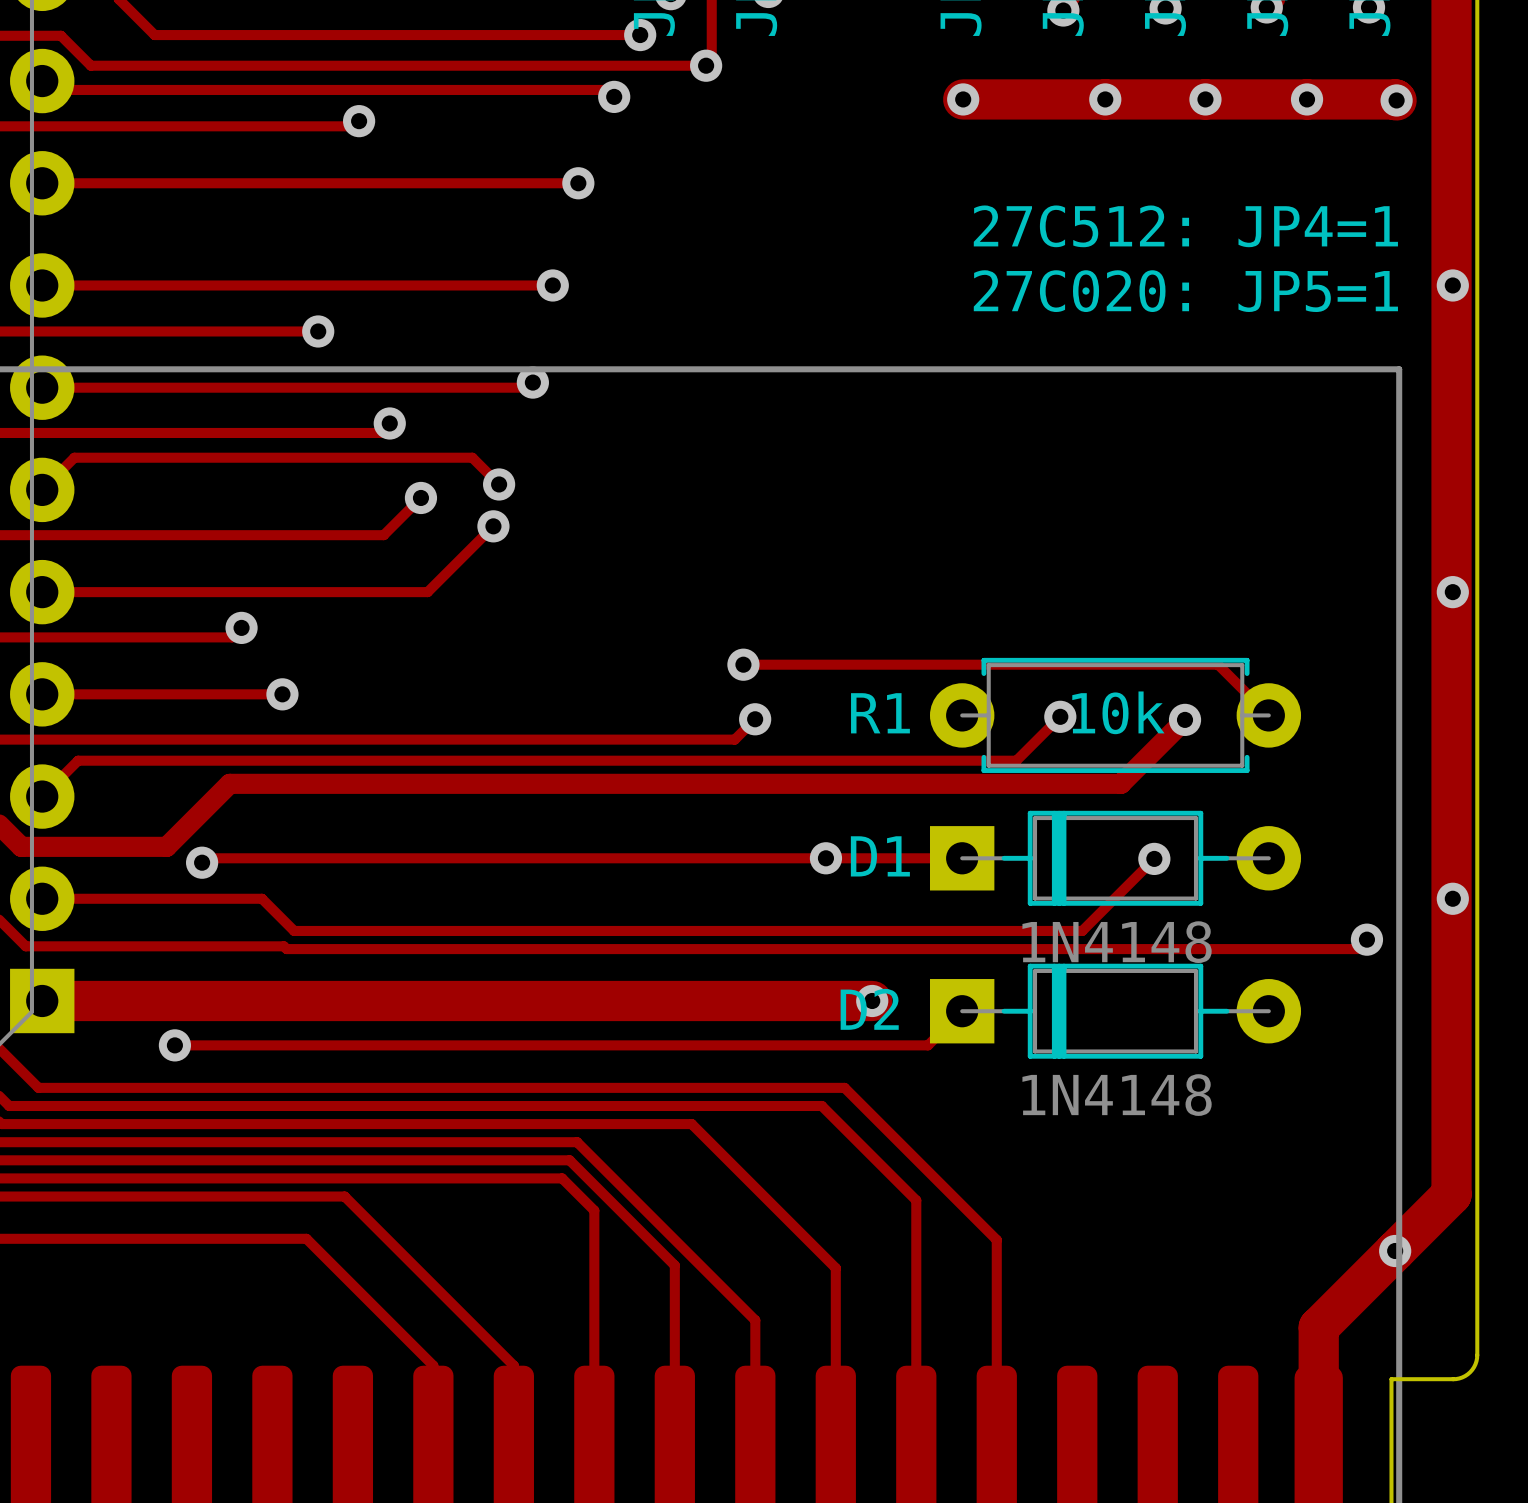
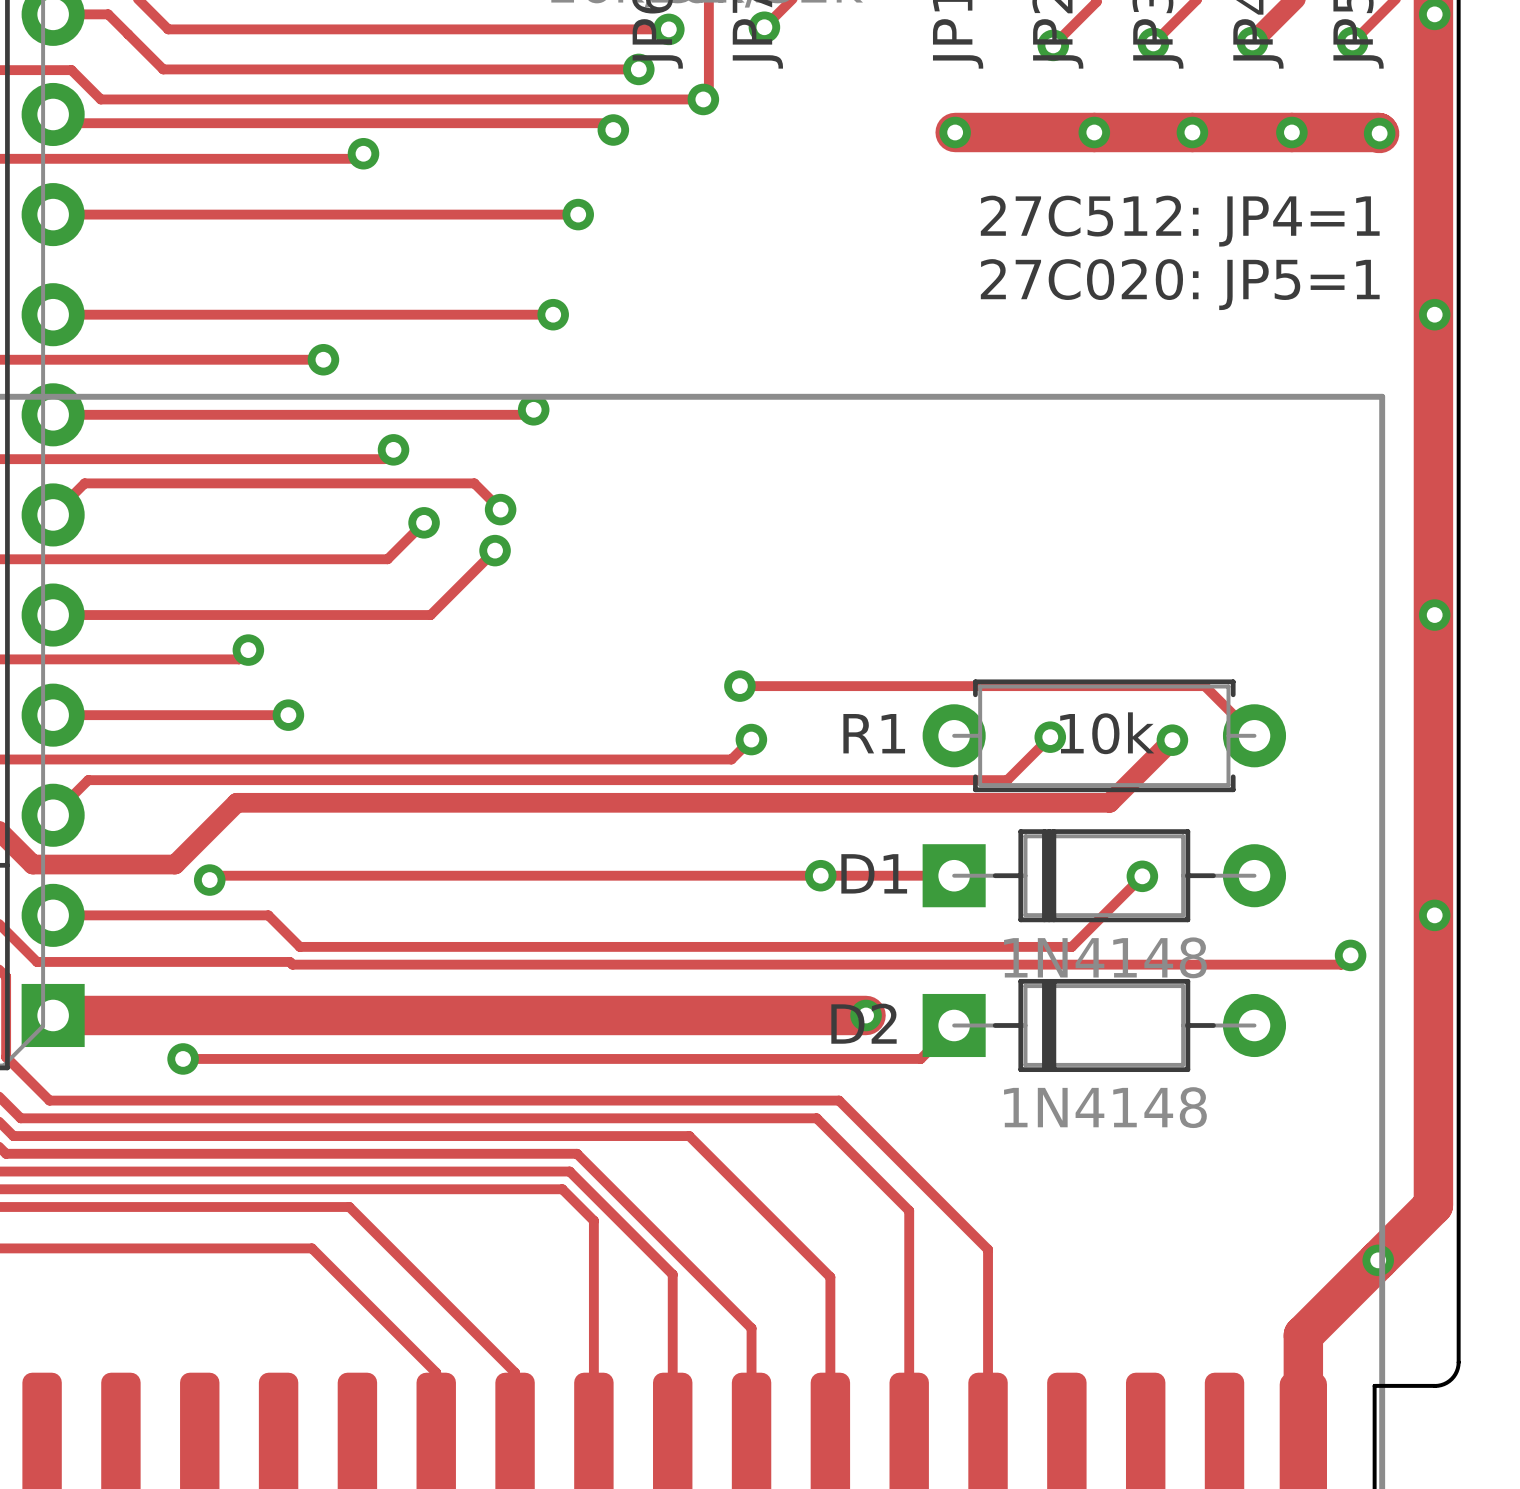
text position: 27C512: JP4=1 (1185, 226) -> 27C512: JP4=1 (1180, 221)
text position: 27C020: JP5=1 (1185, 291) -> 27C020: JP5=1 (1180, 284)

